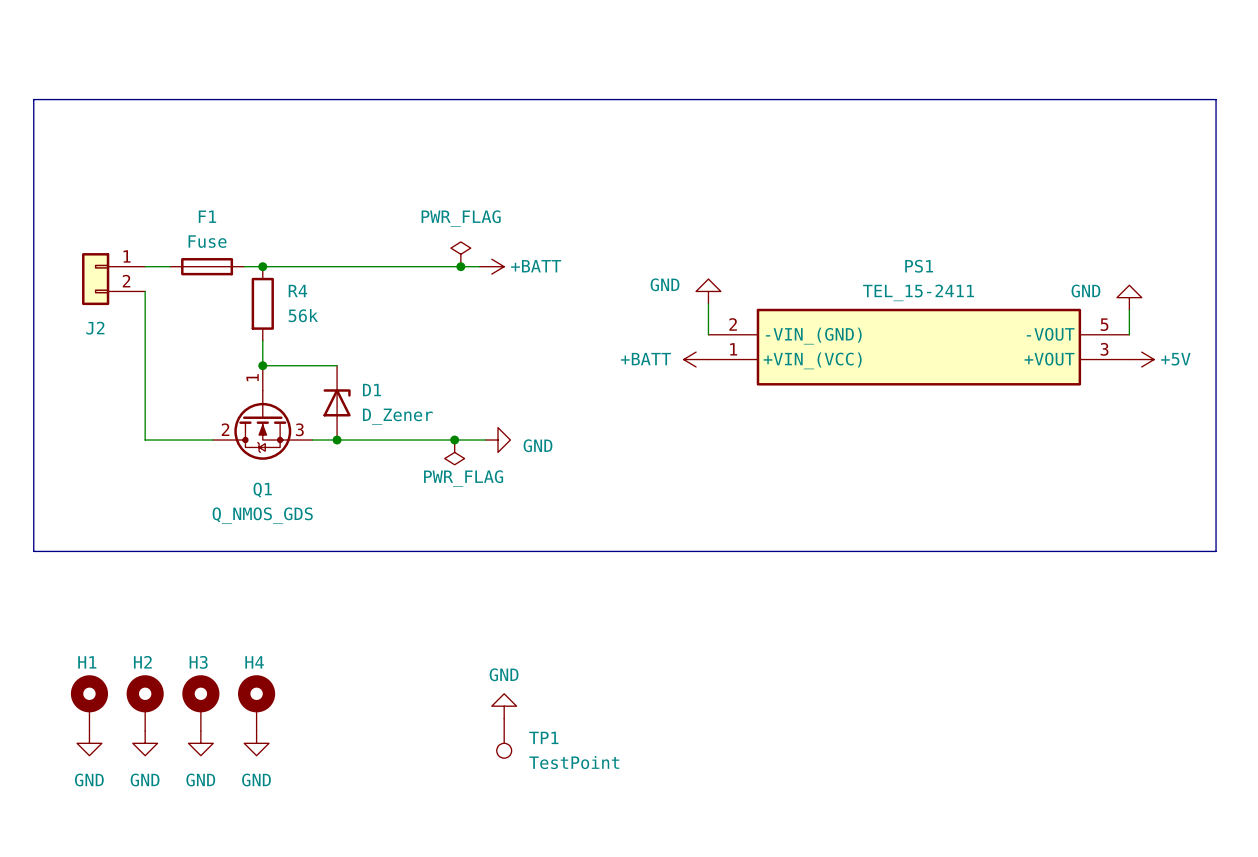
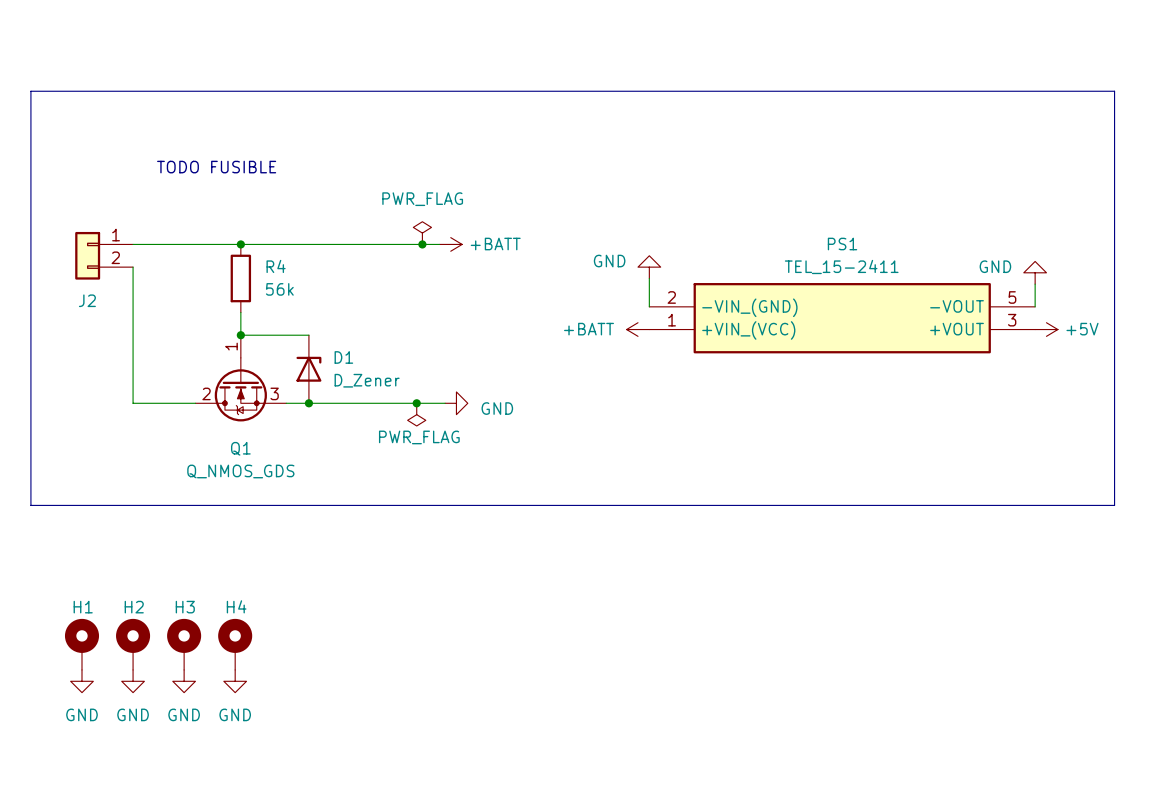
text: none -> TODO FUSIBLE (216, 167)
F1: Fuse (207, 266) -> none
power symbol: GND (504, 706) -> none
TP1: TestPoint (504, 738) -> none

